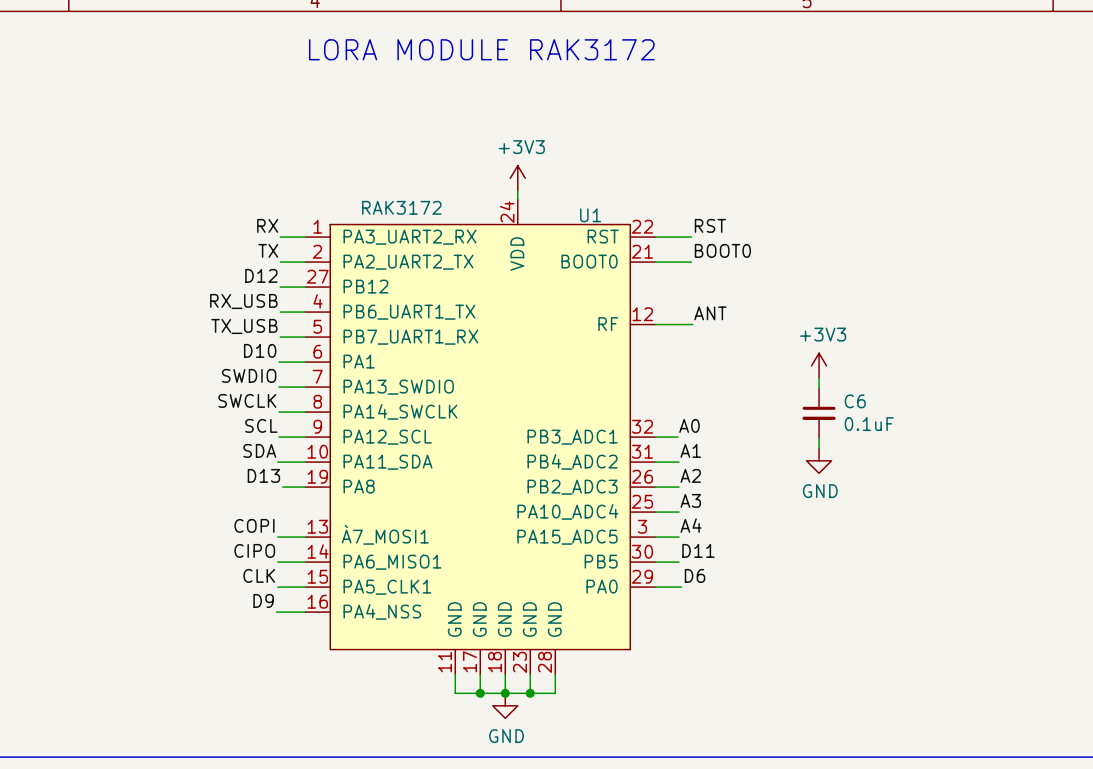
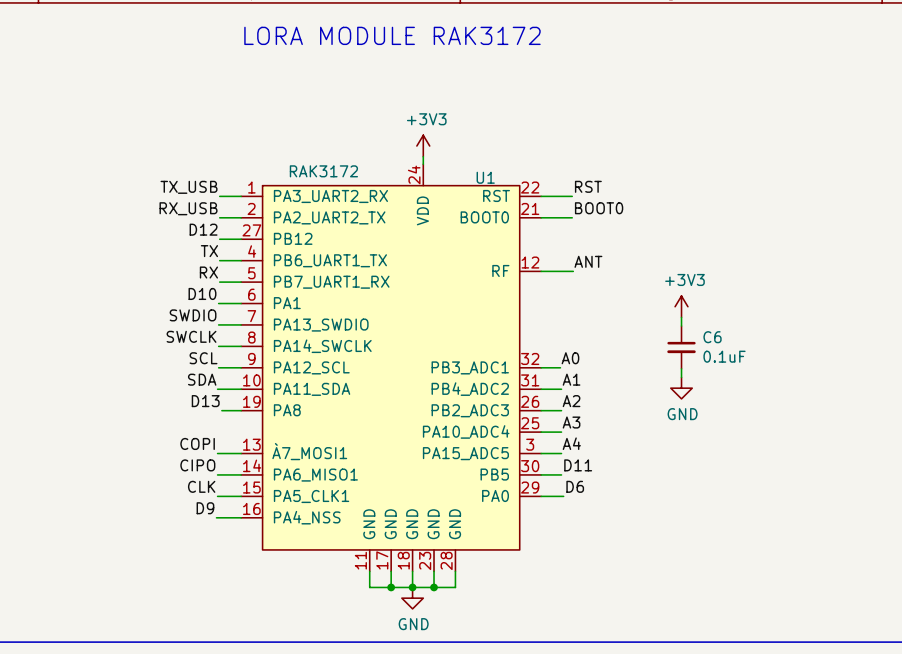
label: RX (267, 225) -> TX_USB (189, 187)
label: TX (268, 250) -> RX_USB (188, 208)
label: RX_USB (243, 301) -> TX (209, 251)
label: TX_USB (244, 326) -> RX (208, 272)

